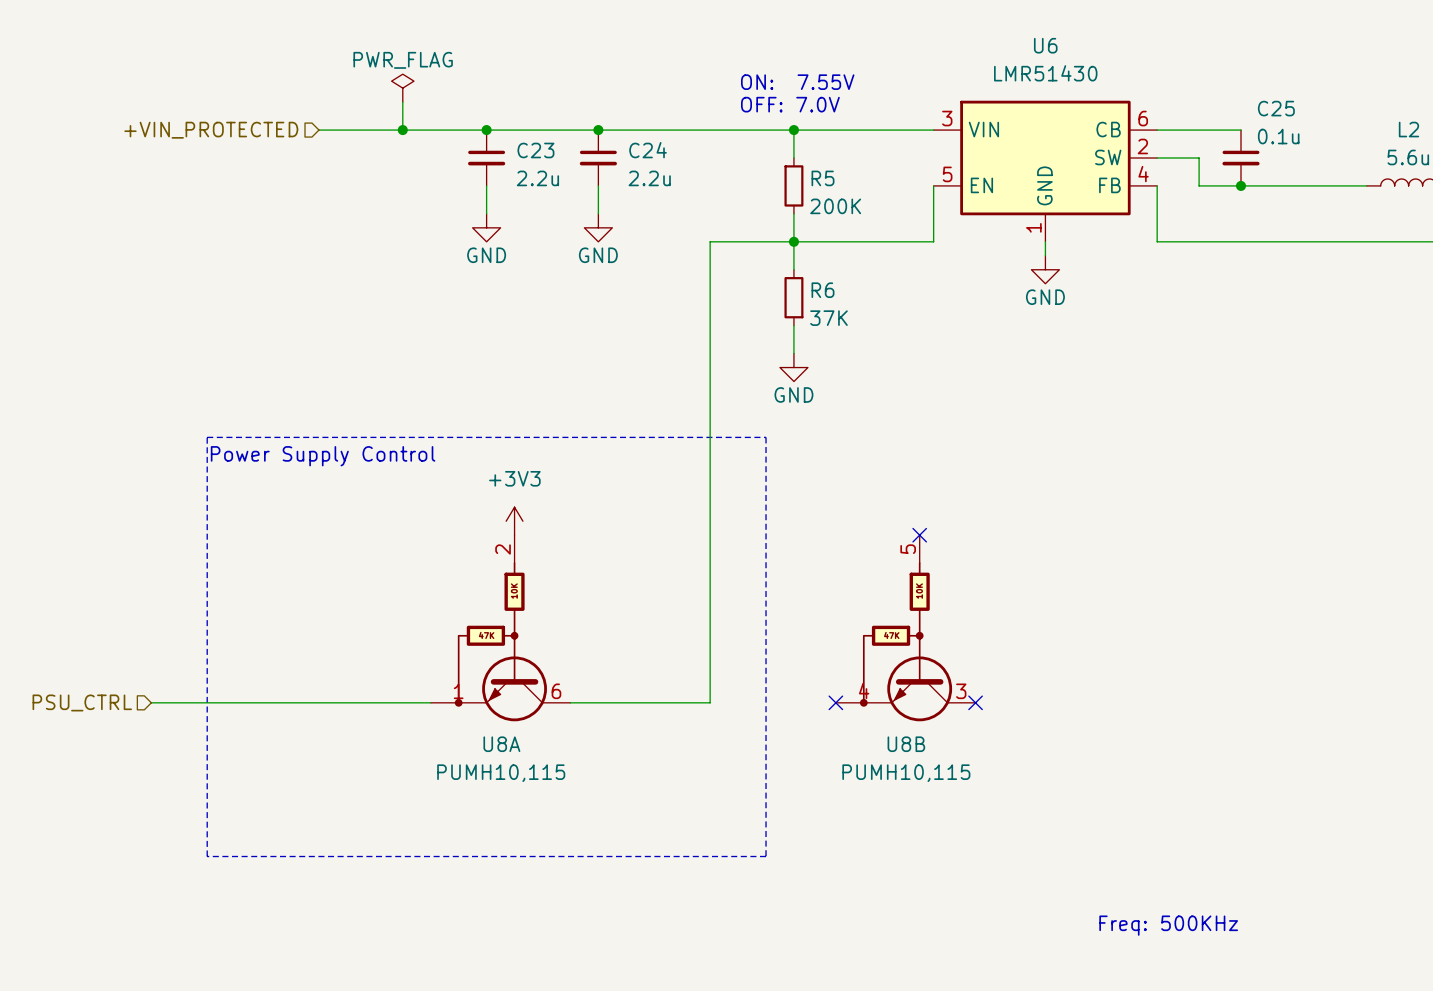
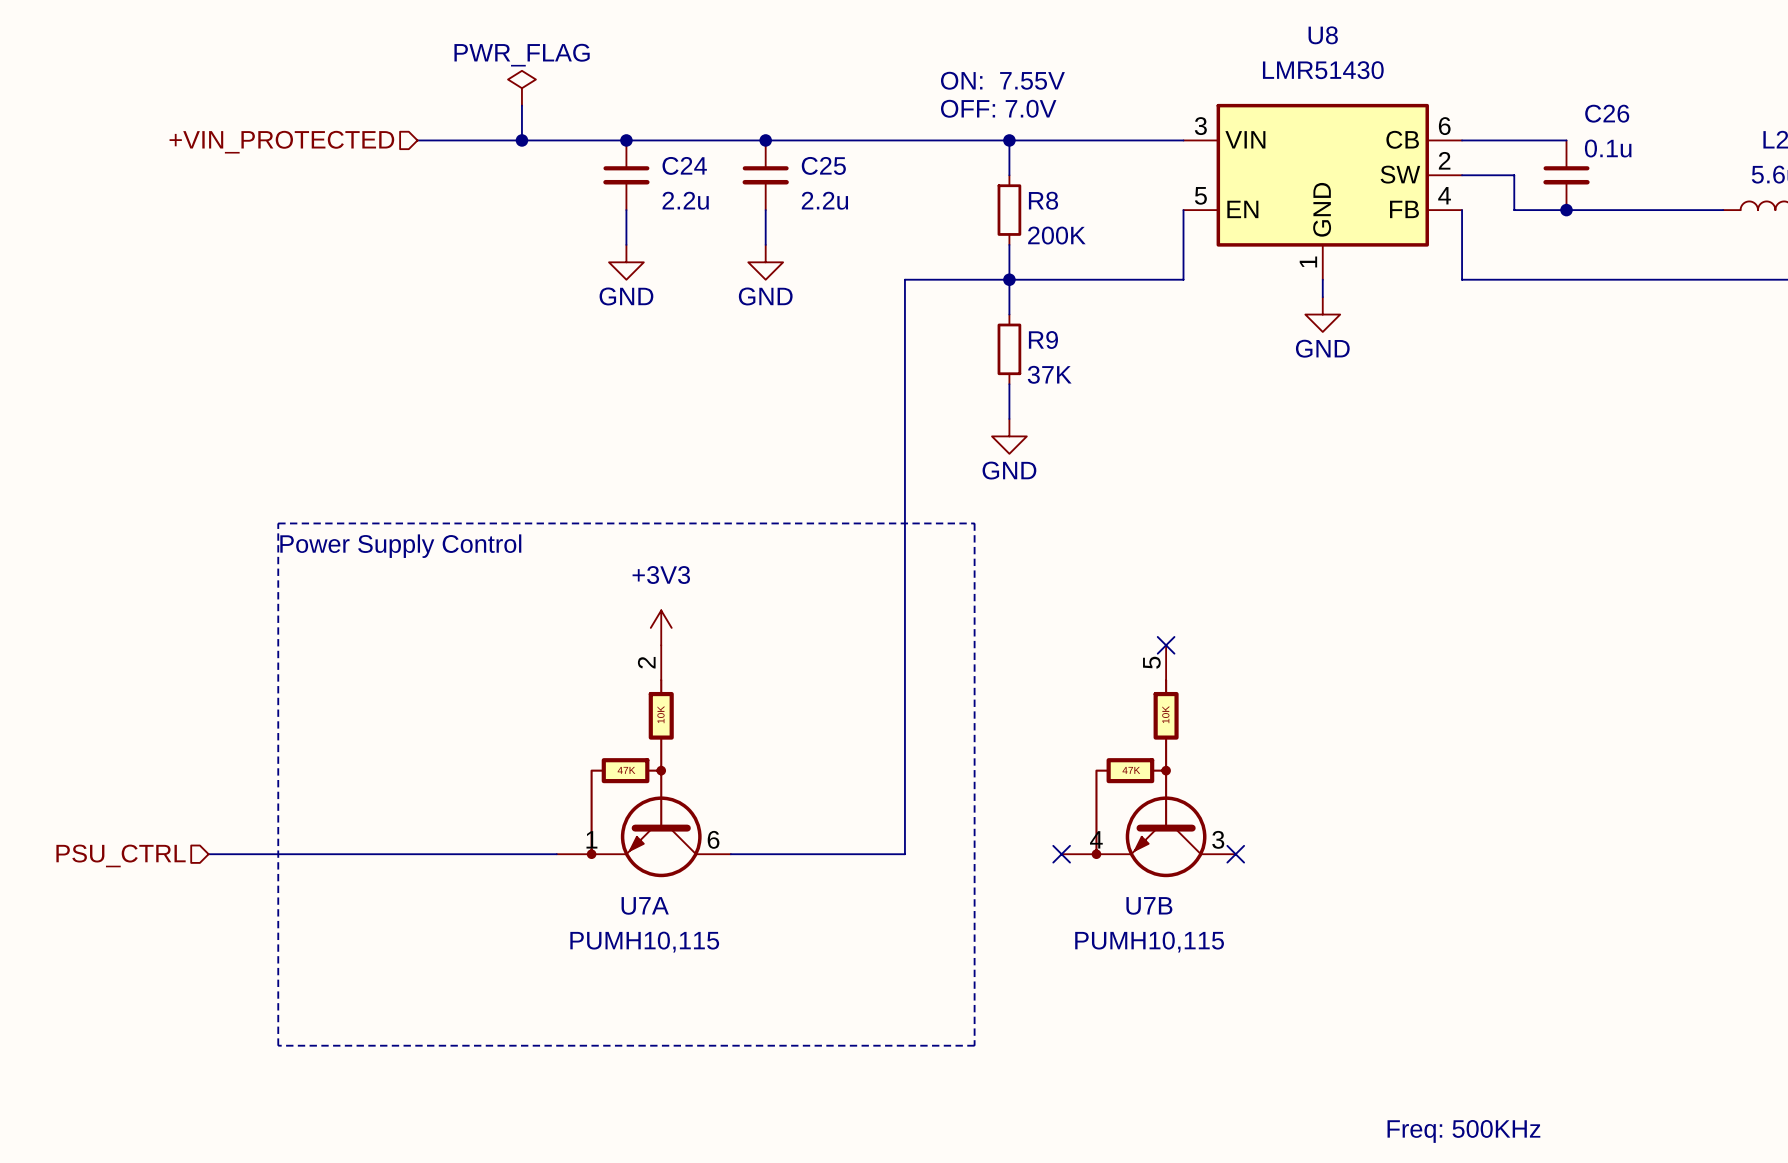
U6 name: U6 (1045, 45) -> U8 (1323, 35)
C25 name: C25 (1276, 108) -> C26 (1607, 113)
C23 name: C23 (535, 150) -> C24 (684, 165)
C24 name: C24 (648, 150) -> C25 (823, 165)
R5 name: R5 (823, 178) -> R8 (1043, 200)
R6 name: R6 (823, 290) -> R9 (1043, 340)
U8A name: U8A (501, 744) -> U7A (645, 905)
U8B name: U8B (906, 744) -> U7B (1149, 905)

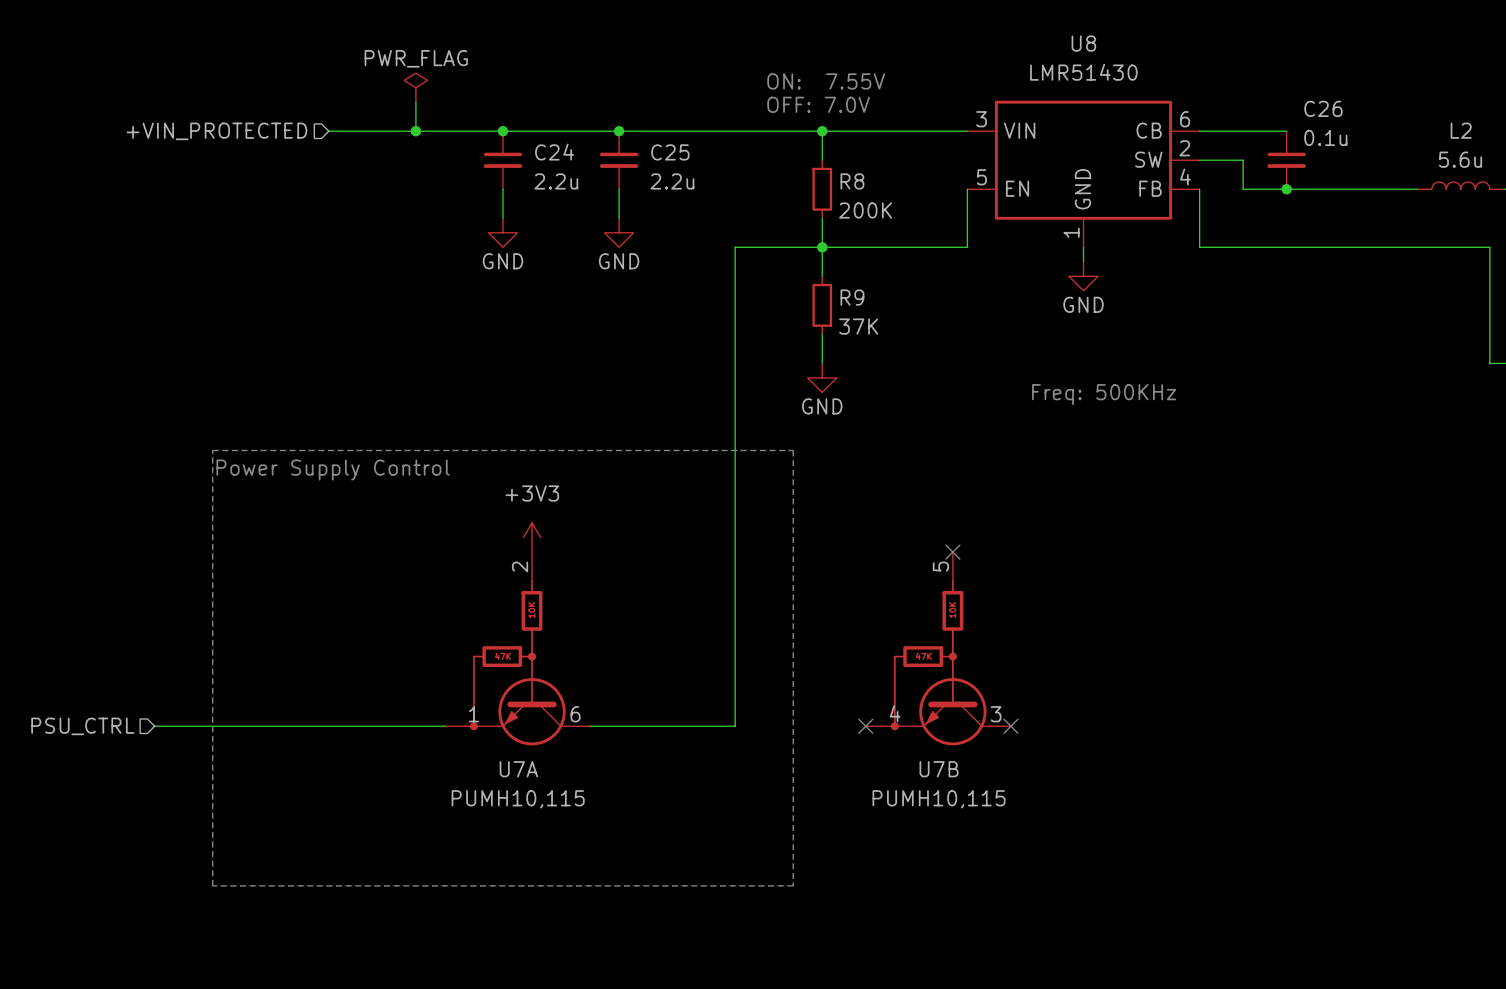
text: none -> Freq: 500KHz (1104, 394)
text: Freq: 500KHz (1463, 1131) -> none

